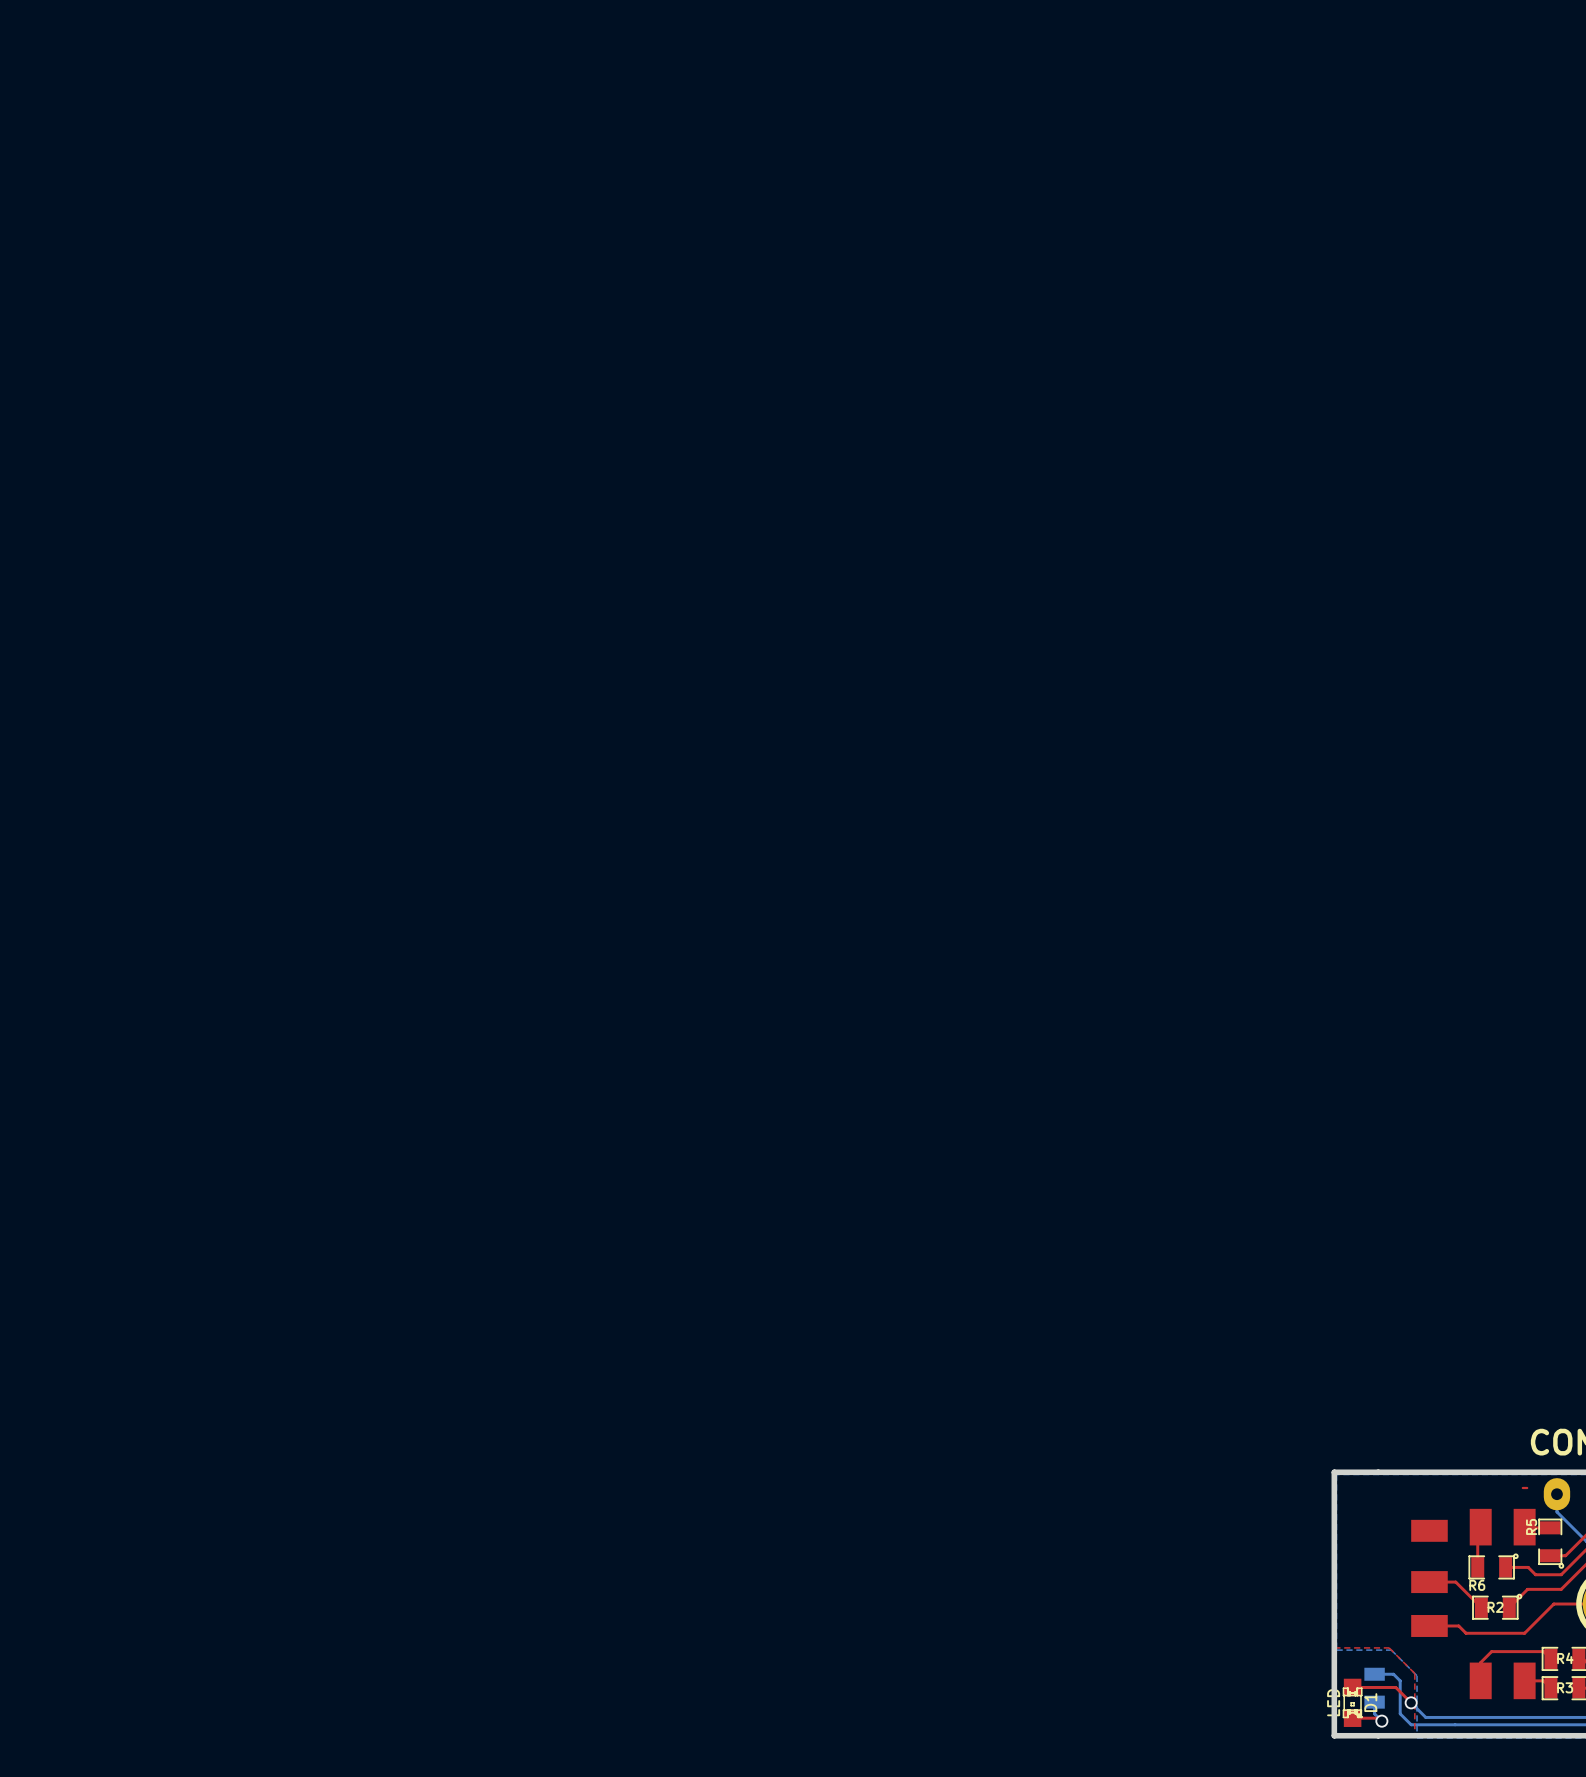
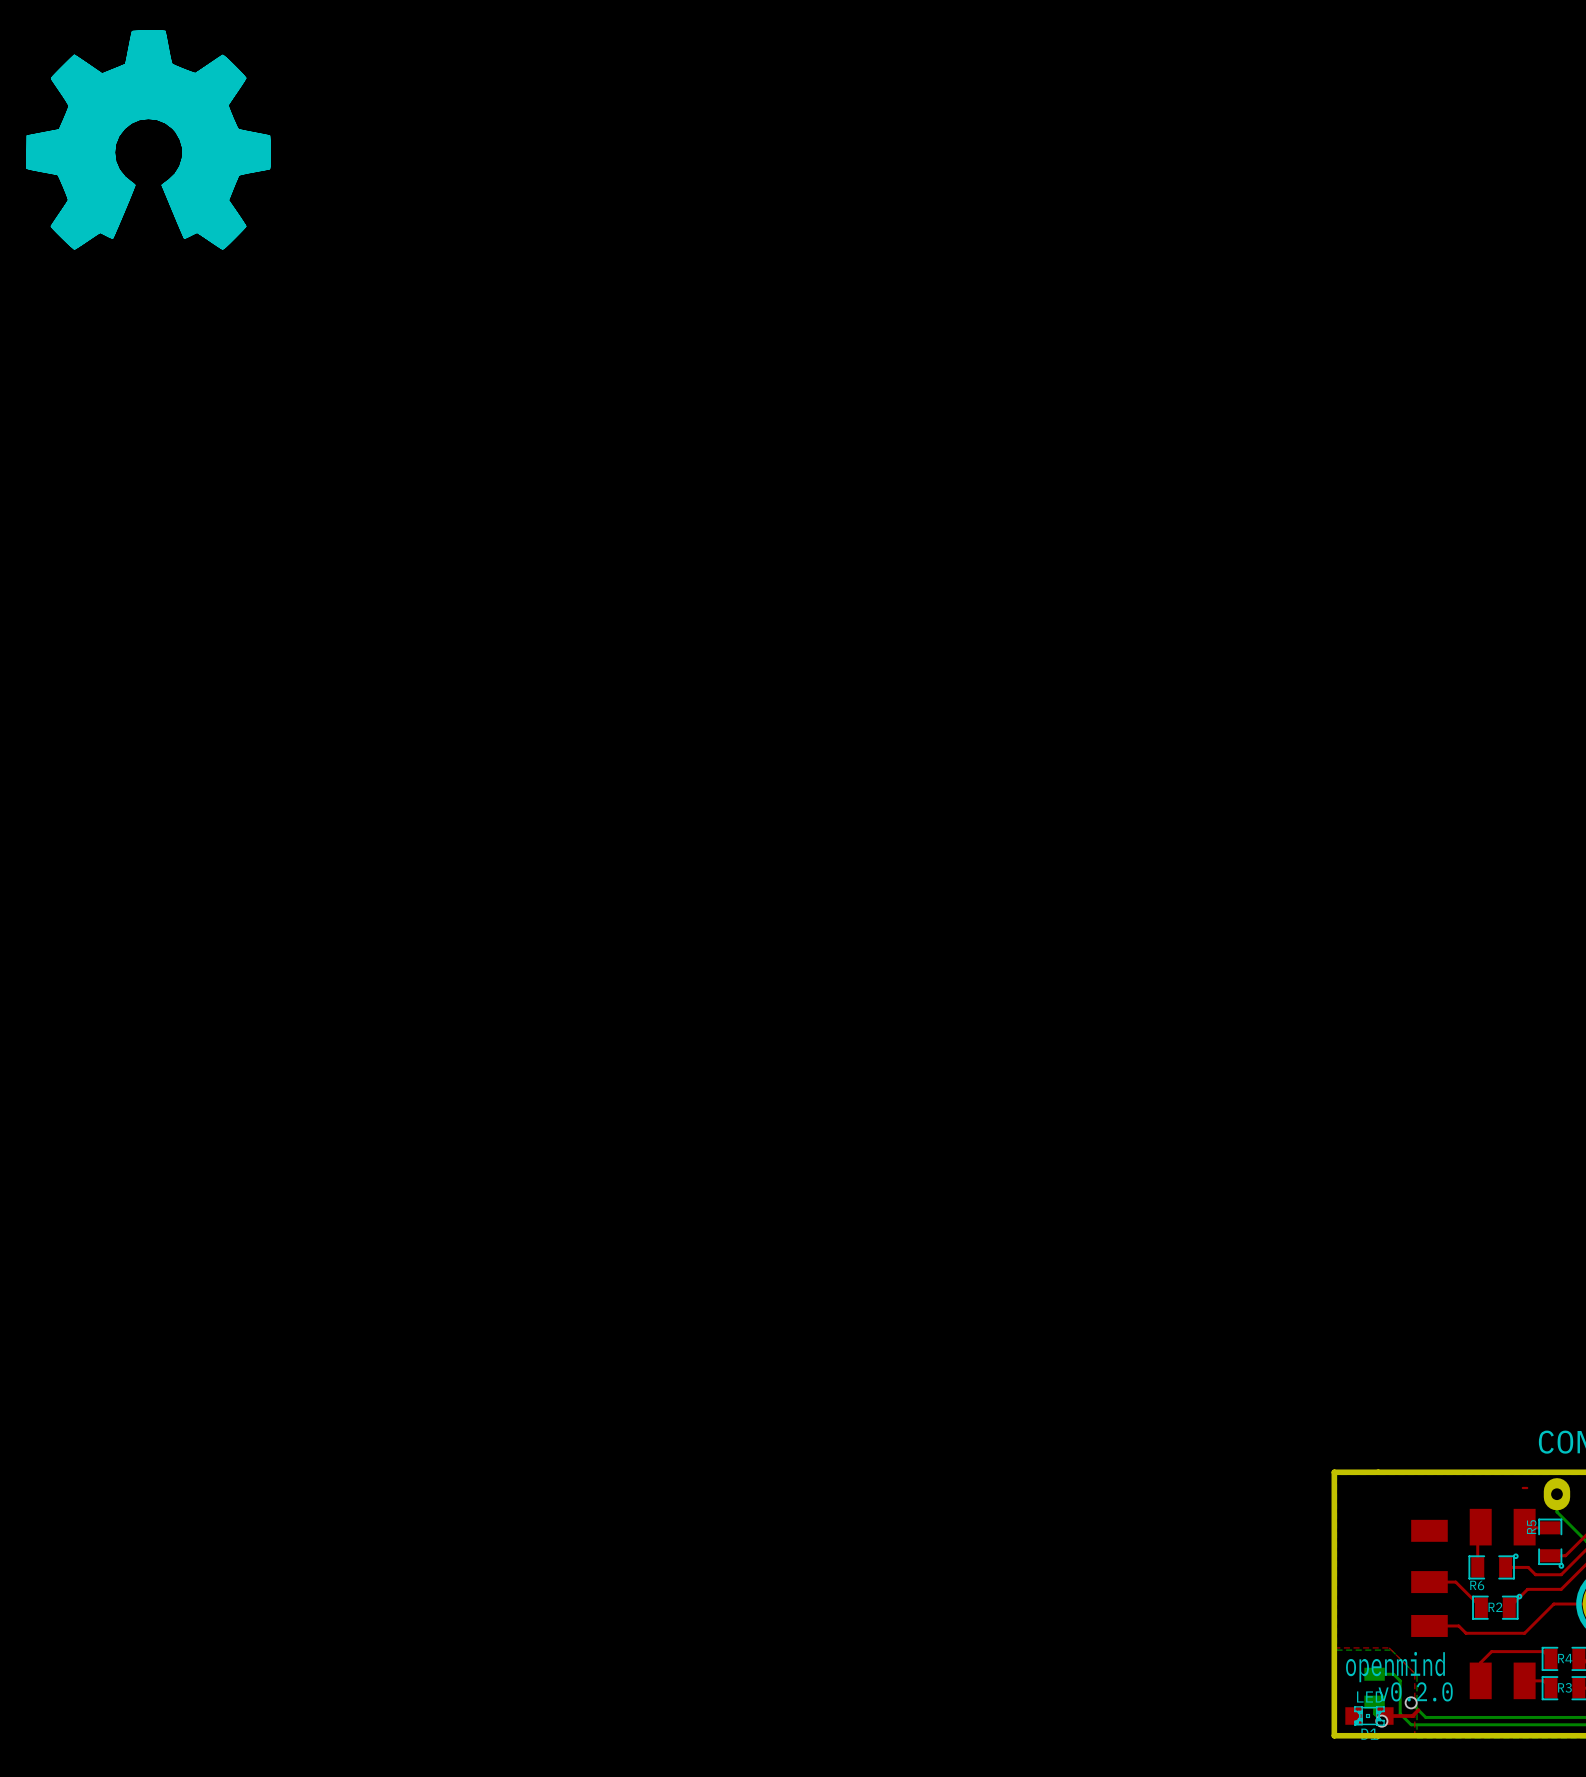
drawing: none -> [26, 30, 271, 250]
text: none -> openmind (1395, 1667)
top track: (1352, 1687) (1395, 1687) (1411, 1702) -> none
text: none -> v0.2.0 (1415, 1691)
D1 rotation: 0° (1352, 1702) -> 90° clockwise (1369, 1716)
top track: none -> (1418, 1710) (1412, 1716) (1384, 1716)
top track: (1352, 1718) (1378, 1718) (1381, 1721) -> none

